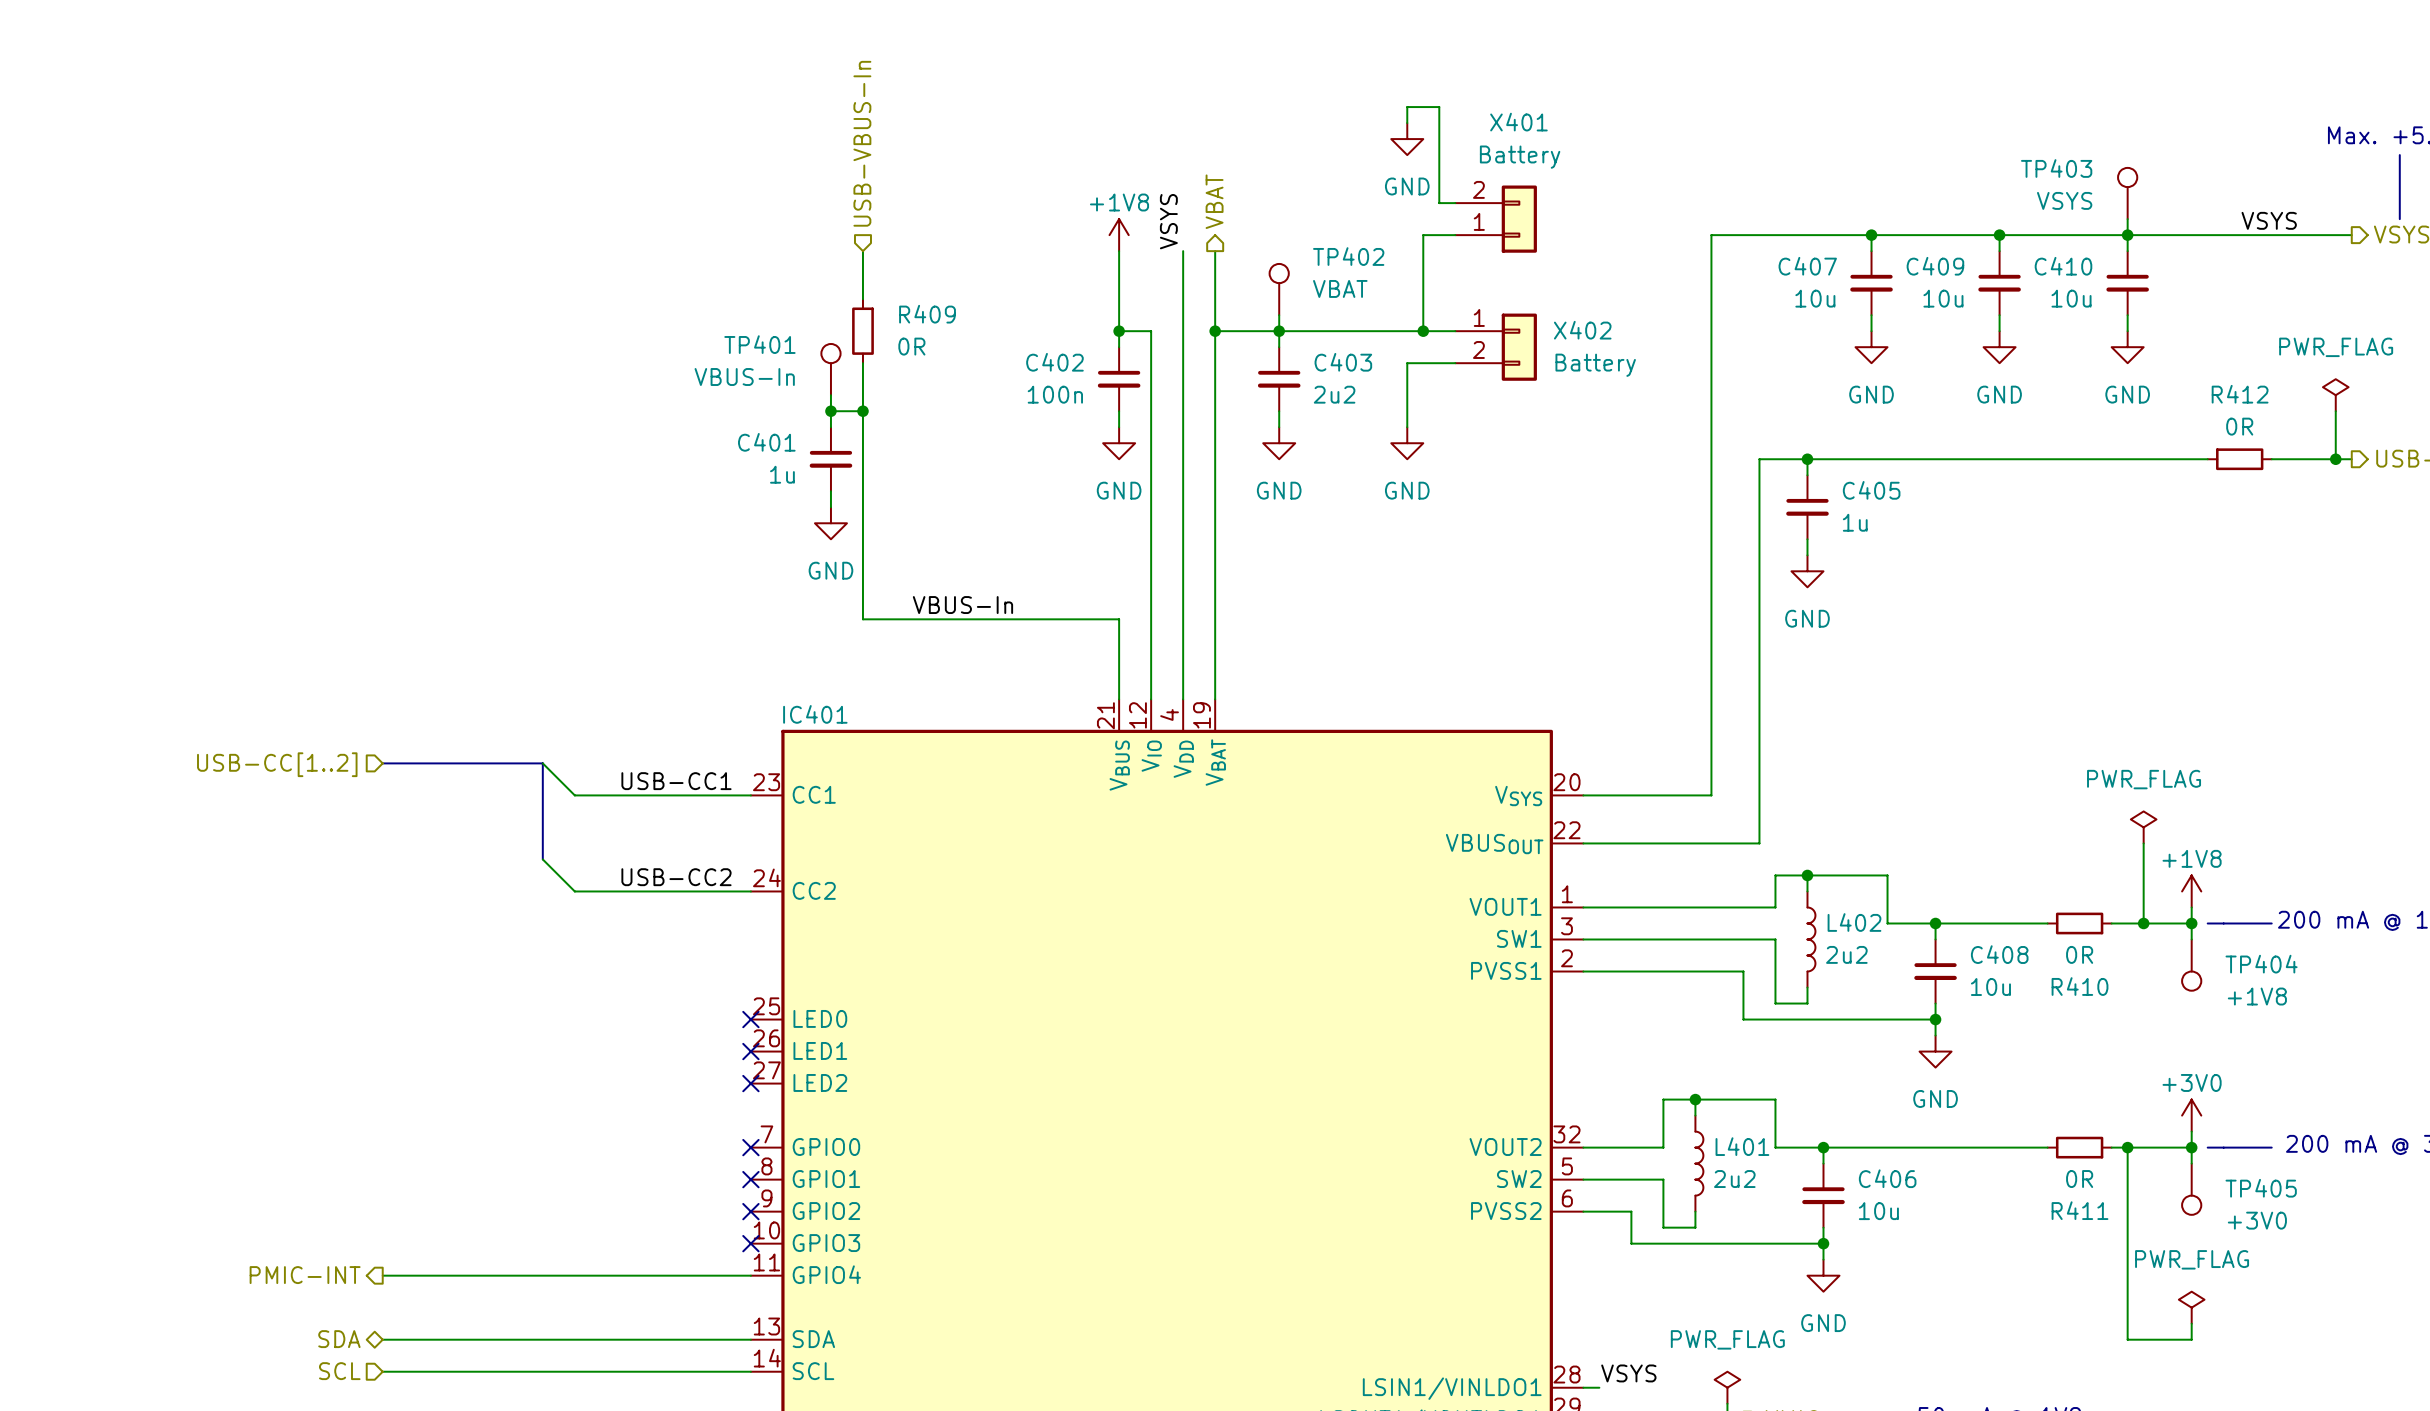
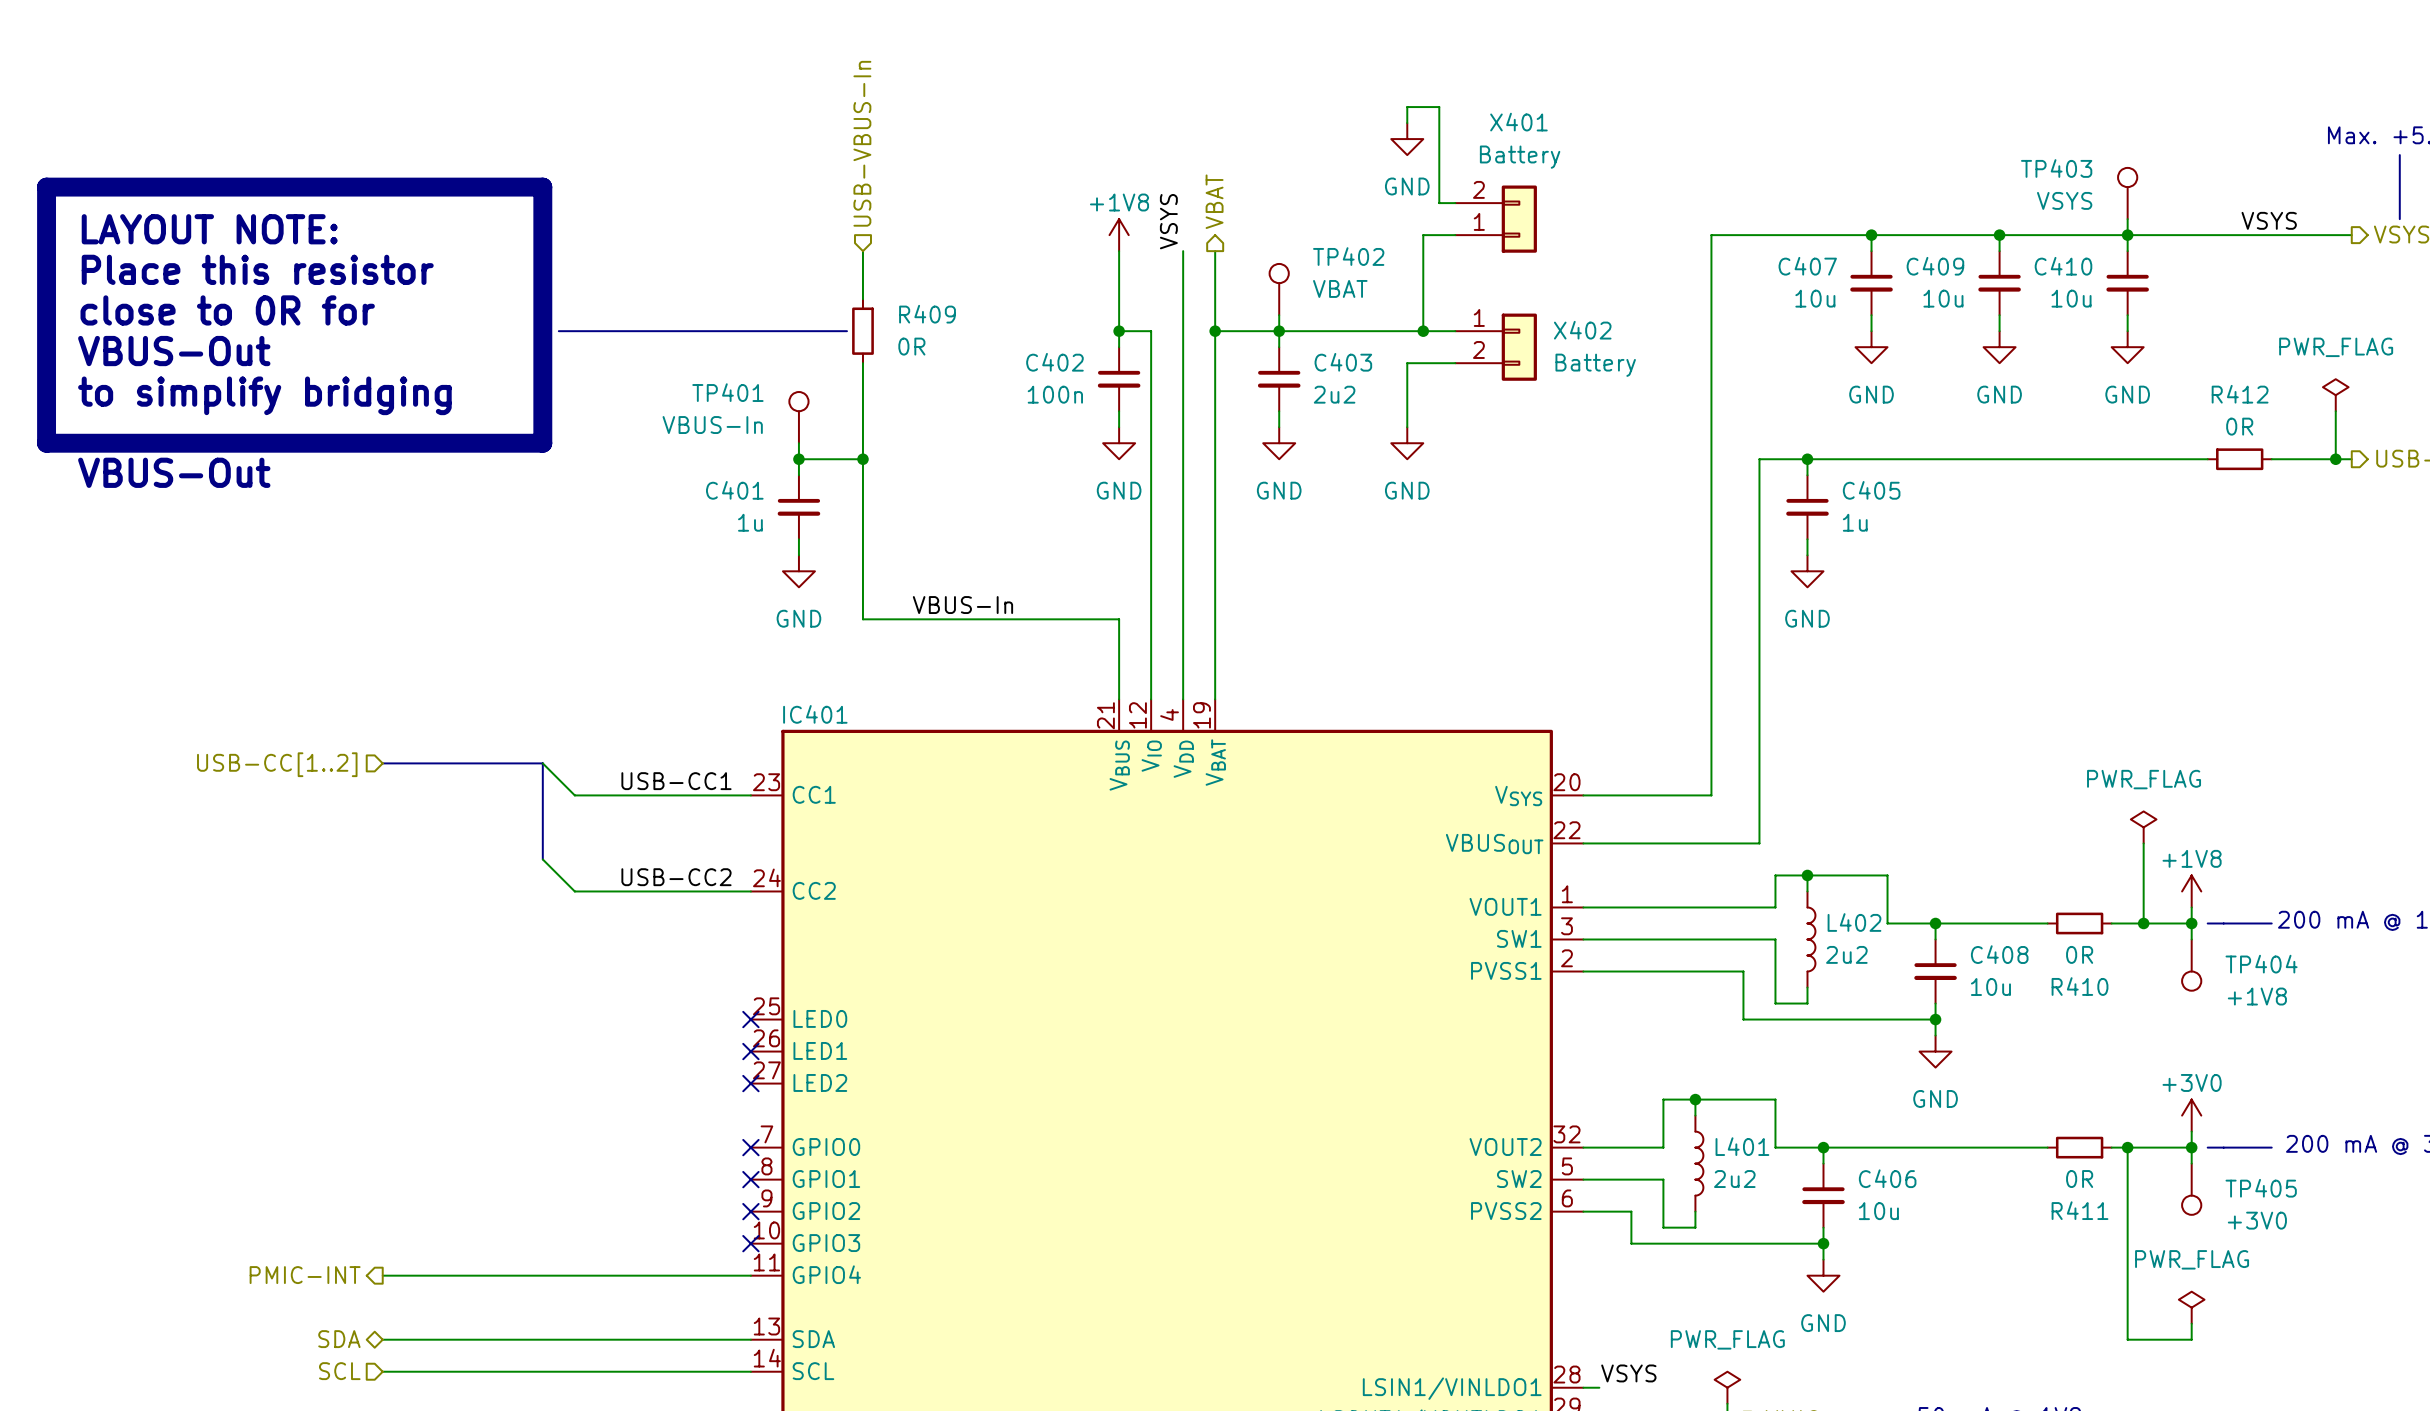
line: none -> (46, 187) (542, 187) (542, 443) (46, 443) (46, 187)
text: none -> LAYOUT NOTE: (209, 229)
text: none -> Place this resistor (257, 269)
text: none -> close to 0R for (227, 310)
line: none -> (558, 331) (846, 331)
text: none -> VBUS-Out (174, 351)
TP401 position: (830, 369) -> (798, 417)
text: none -> to simplify bridging (264, 395)
wire: (830, 395) (830, 427) -> (798, 443) (798, 475)
wire: (830, 411) (862, 411) -> none
junction: (830, 411) -> none
junction: (862, 411) -> none
wire: none -> (798, 459) (862, 459)
junction: none -> (798, 459)
C401 position: (830, 459) -> (798, 507)
junction: none -> (862, 459)
text: none -> VBUS-Out (174, 472)
wire: (830, 491) (830, 507) -> (798, 539) (798, 555)
power symbol position: GND (830, 523) -> GND (798, 571)

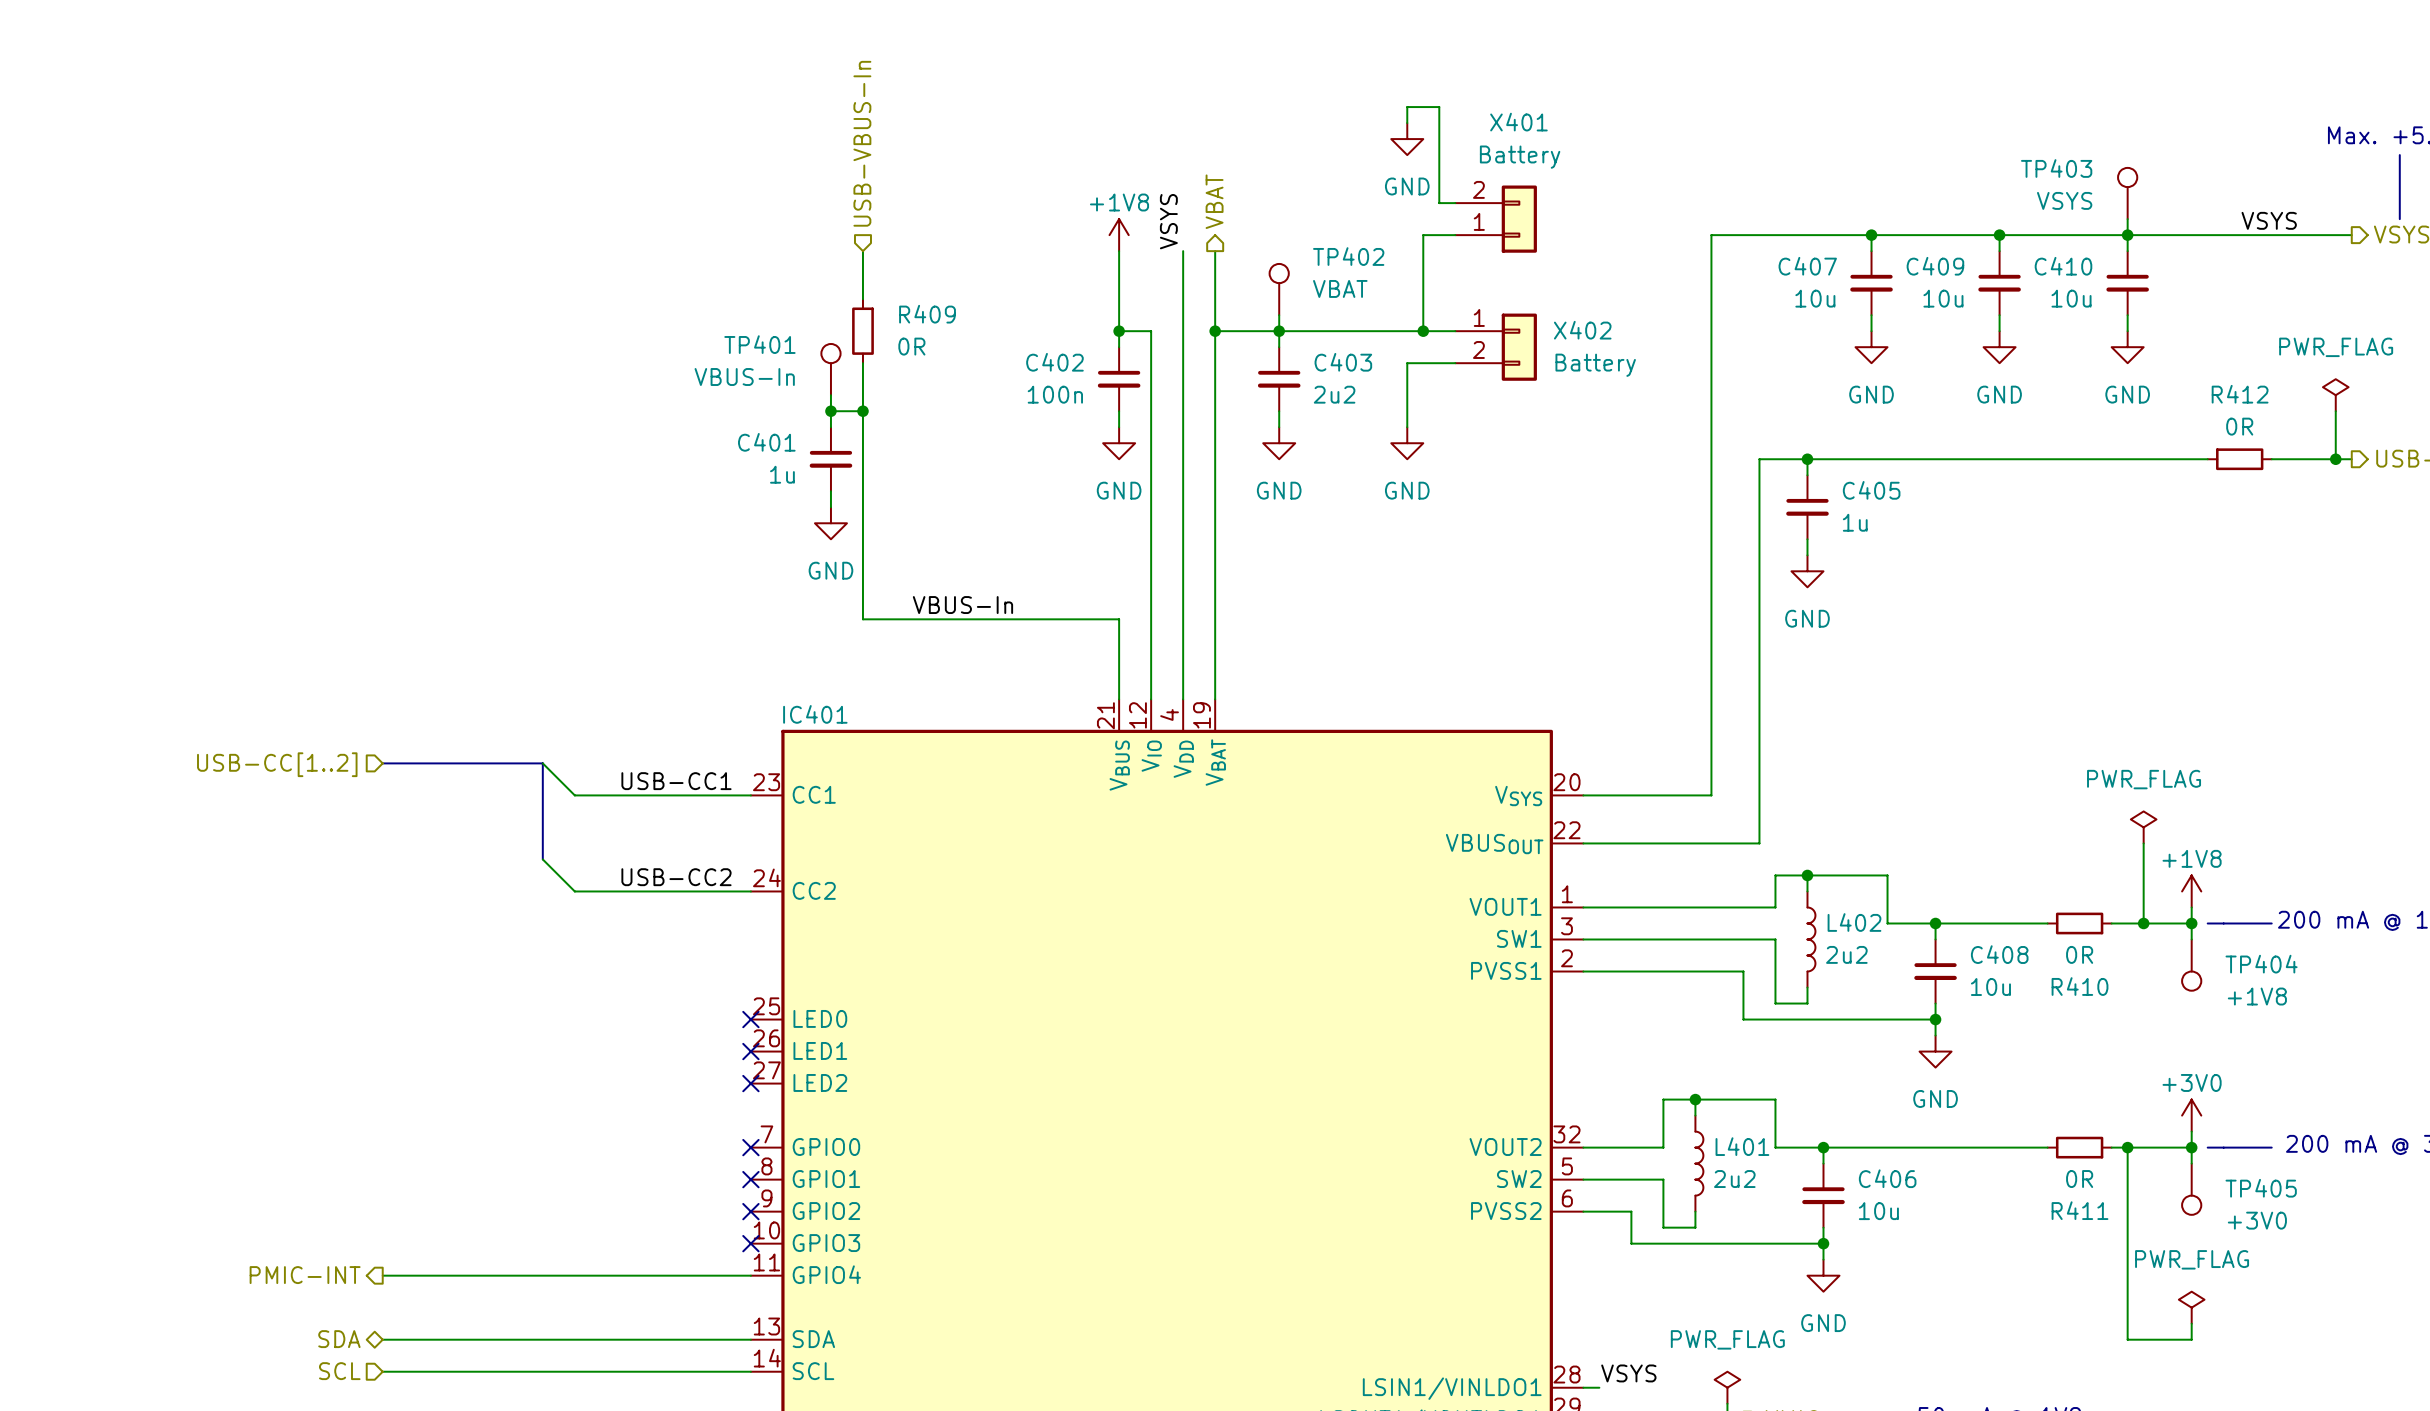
line: (46, 187) (542, 187) (542, 443) (46, 443) (46, 187) -> none
text: LAYOUT NOTE: (209, 229) -> none
text: Place this resistor (257, 269) -> none
text: close to 0R for (227, 310) -> none
line: (558, 331) (846, 331) -> none
text: VBUS-Out (174, 351) -> none
text: to simplify bridging (264, 395) -> none
wire: none -> (830, 411) (862, 411)
junction: none -> (830, 411)
junction: none -> (862, 411)
TP401 position: (798, 417) -> (830, 369)
wire: (798, 443) (798, 475) -> (830, 395) (830, 427)
wire: (798, 459) (862, 459) -> none
junction: (798, 459) -> none
junction: (862, 459) -> none
text: VBUS-Out (174, 472) -> none
C401 position: (798, 507) -> (830, 459)
wire: (798, 539) (798, 555) -> (830, 491) (830, 507)
power symbol position: GND (798, 571) -> GND (830, 523)

